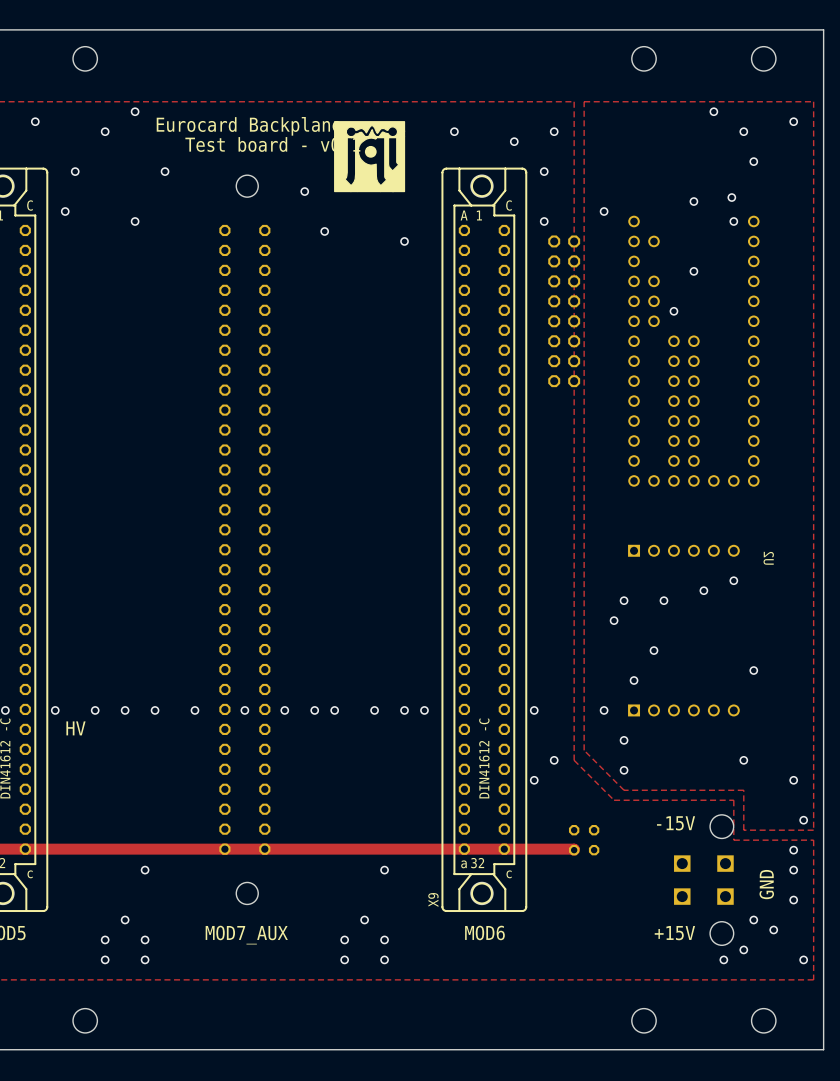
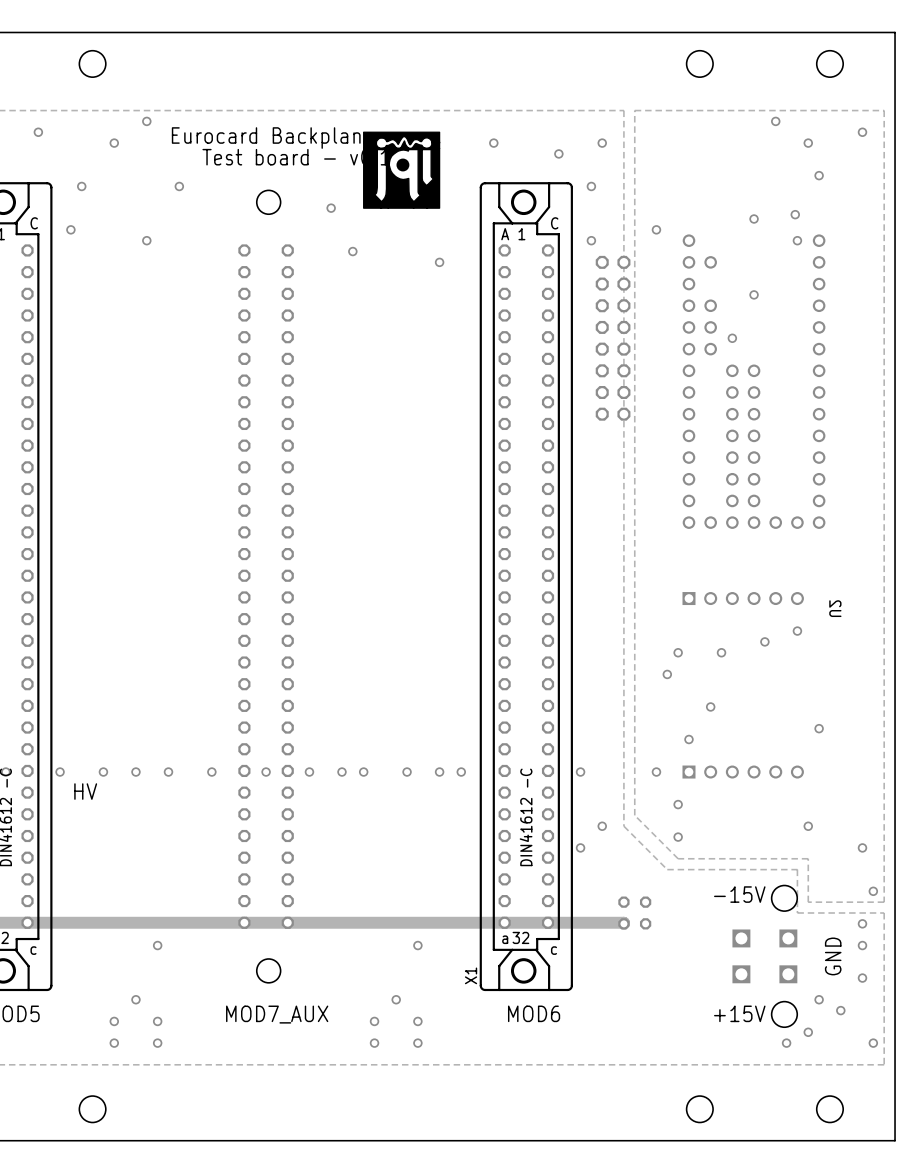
X9 name: X9 (433, 899) -> X1 (471, 975)

